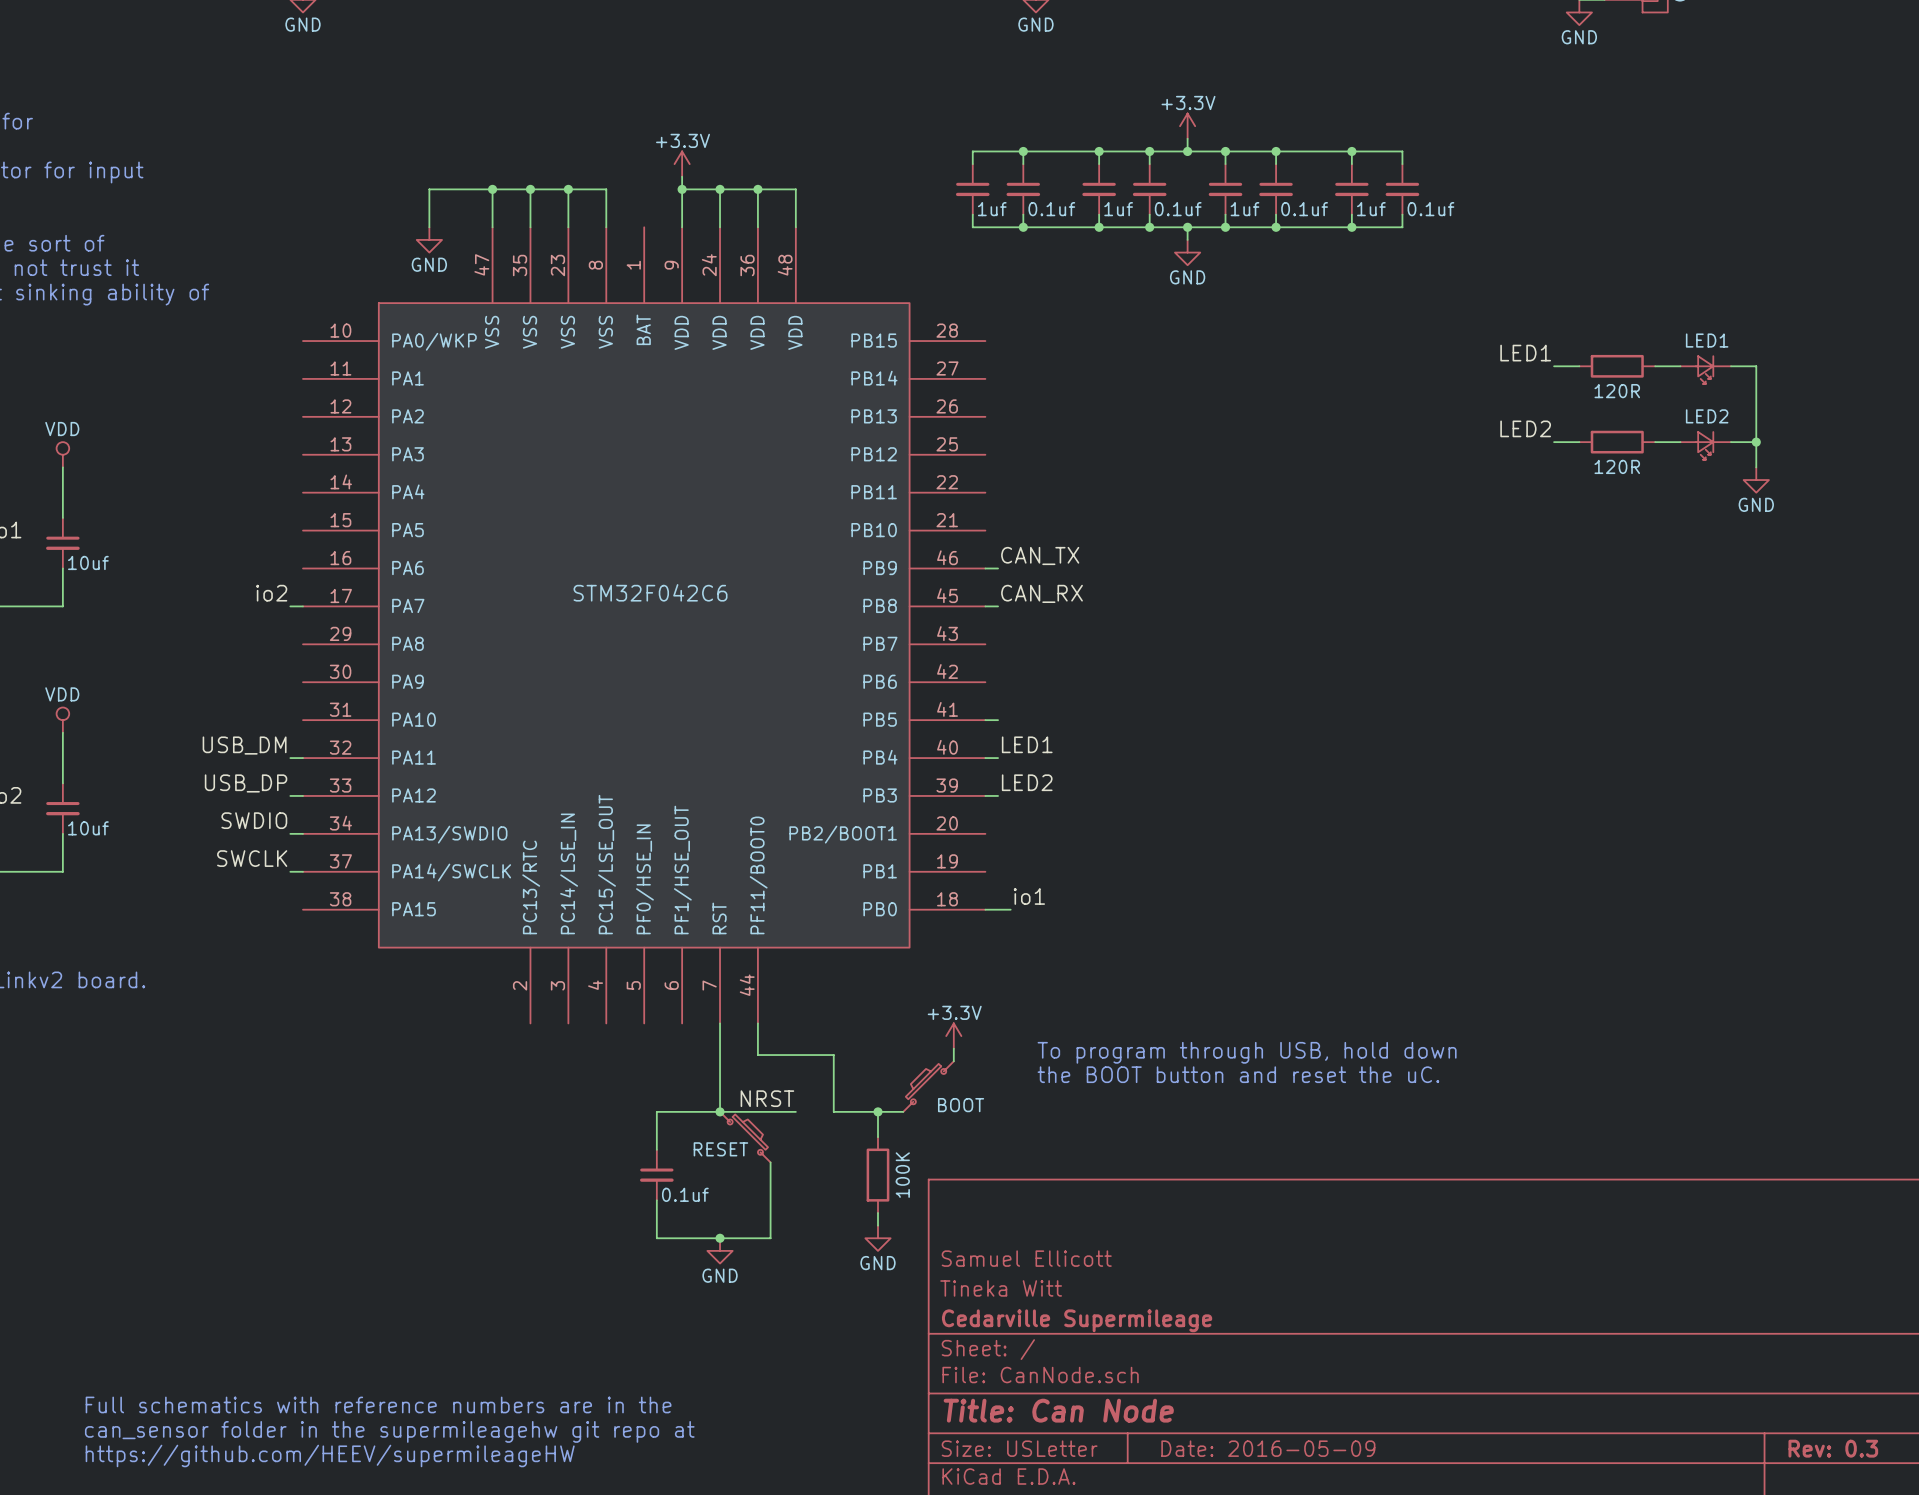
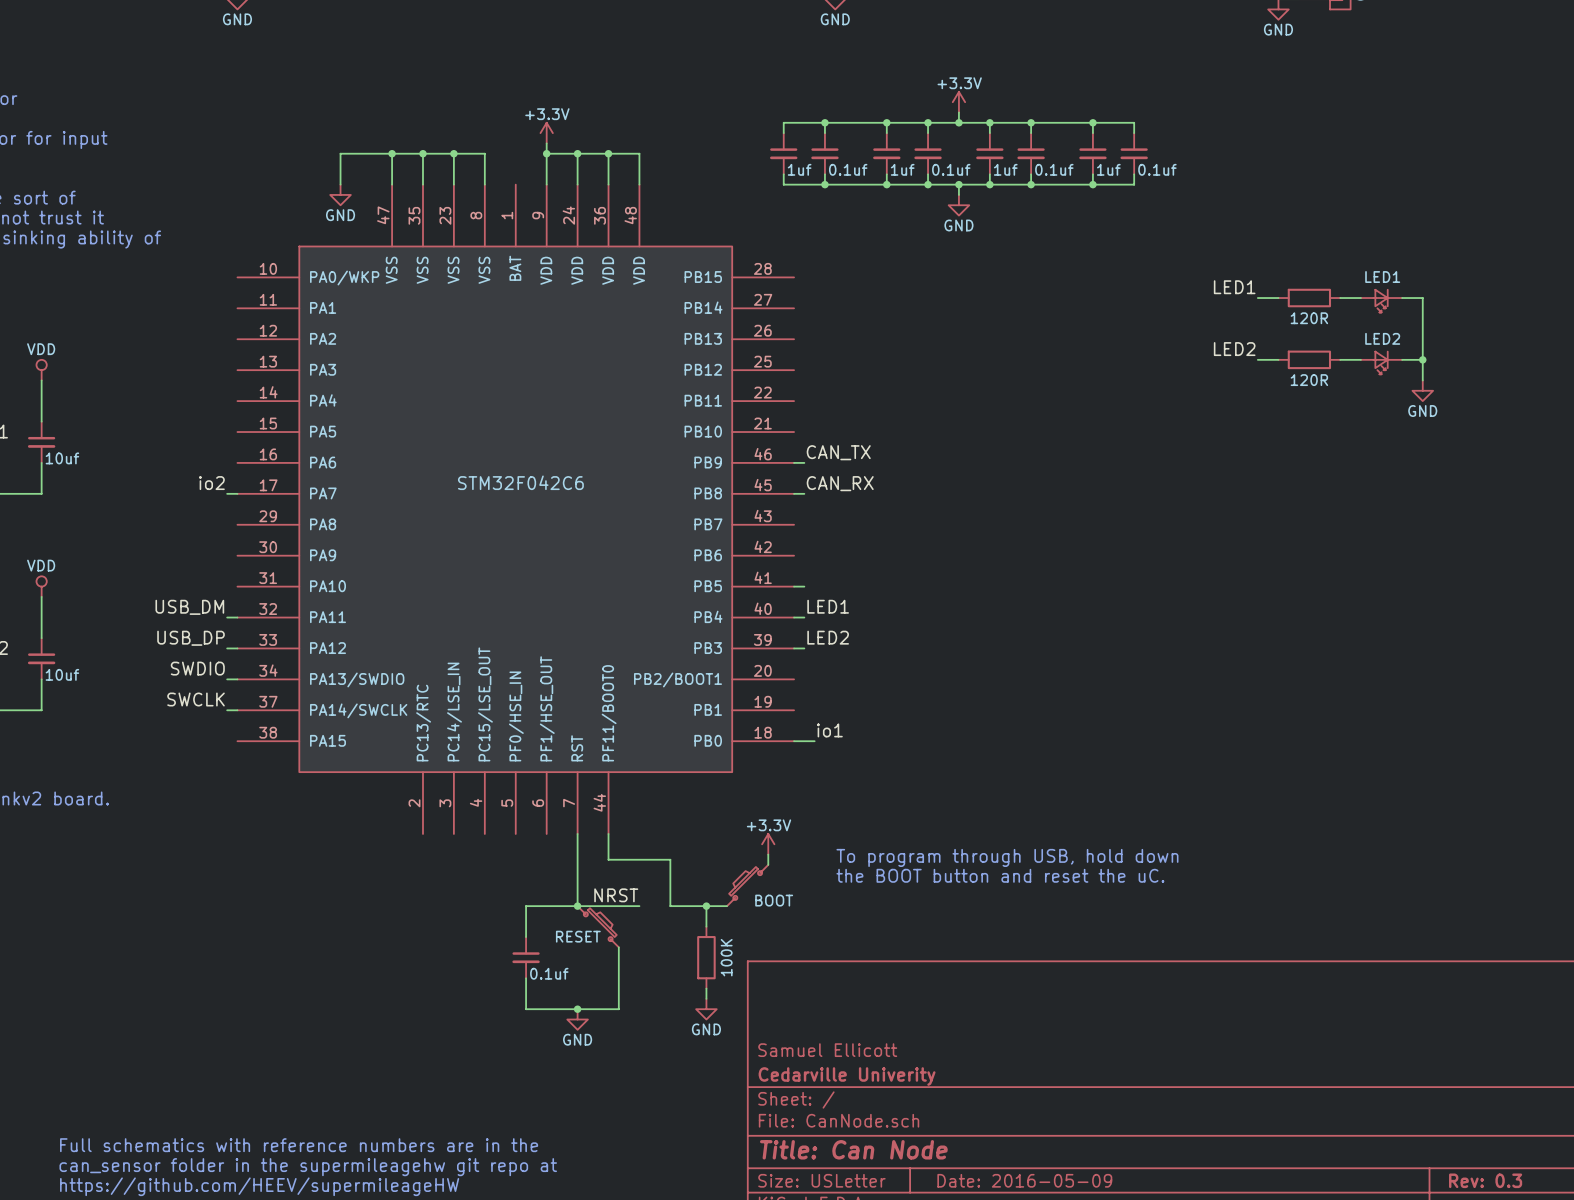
title block: Samuel Ellicott (1026, 1258) -> none
title block: Tineka Witt (1001, 1288) -> Samuel Ellicott (827, 1050)
title block: Cedarville Supermileage (1077, 1320) -> Cedarville Univerity (847, 1076)

